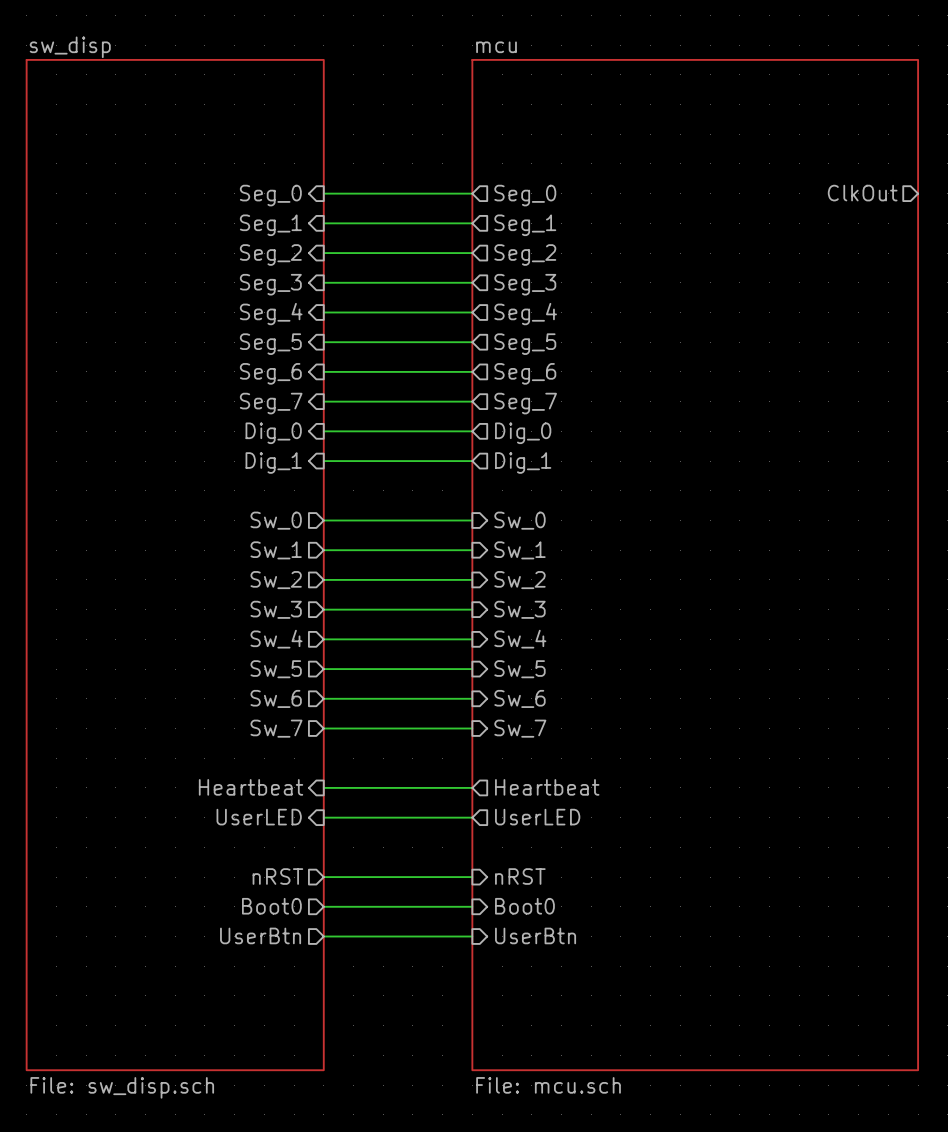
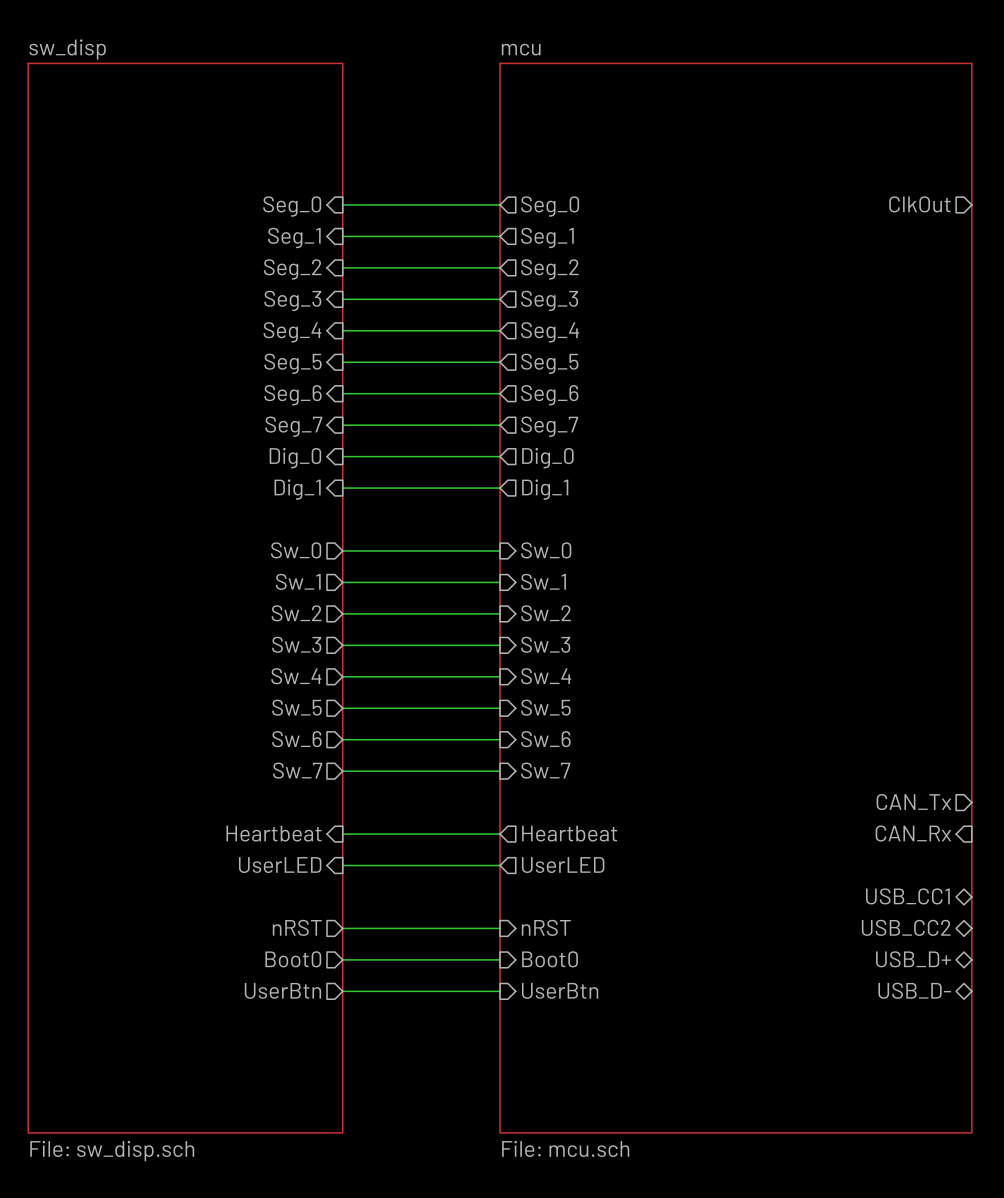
sheet pin: none -> CAN_Tx (913, 802)
sheet pin: none -> CAN_Rx (913, 833)
sheet pin: none -> USB_CC1 (907, 896)
sheet pin: none -> USB_CC2 (906, 927)
sheet pin: none -> USB_D+ (913, 959)
sheet pin: none -> USB_D- (914, 990)

